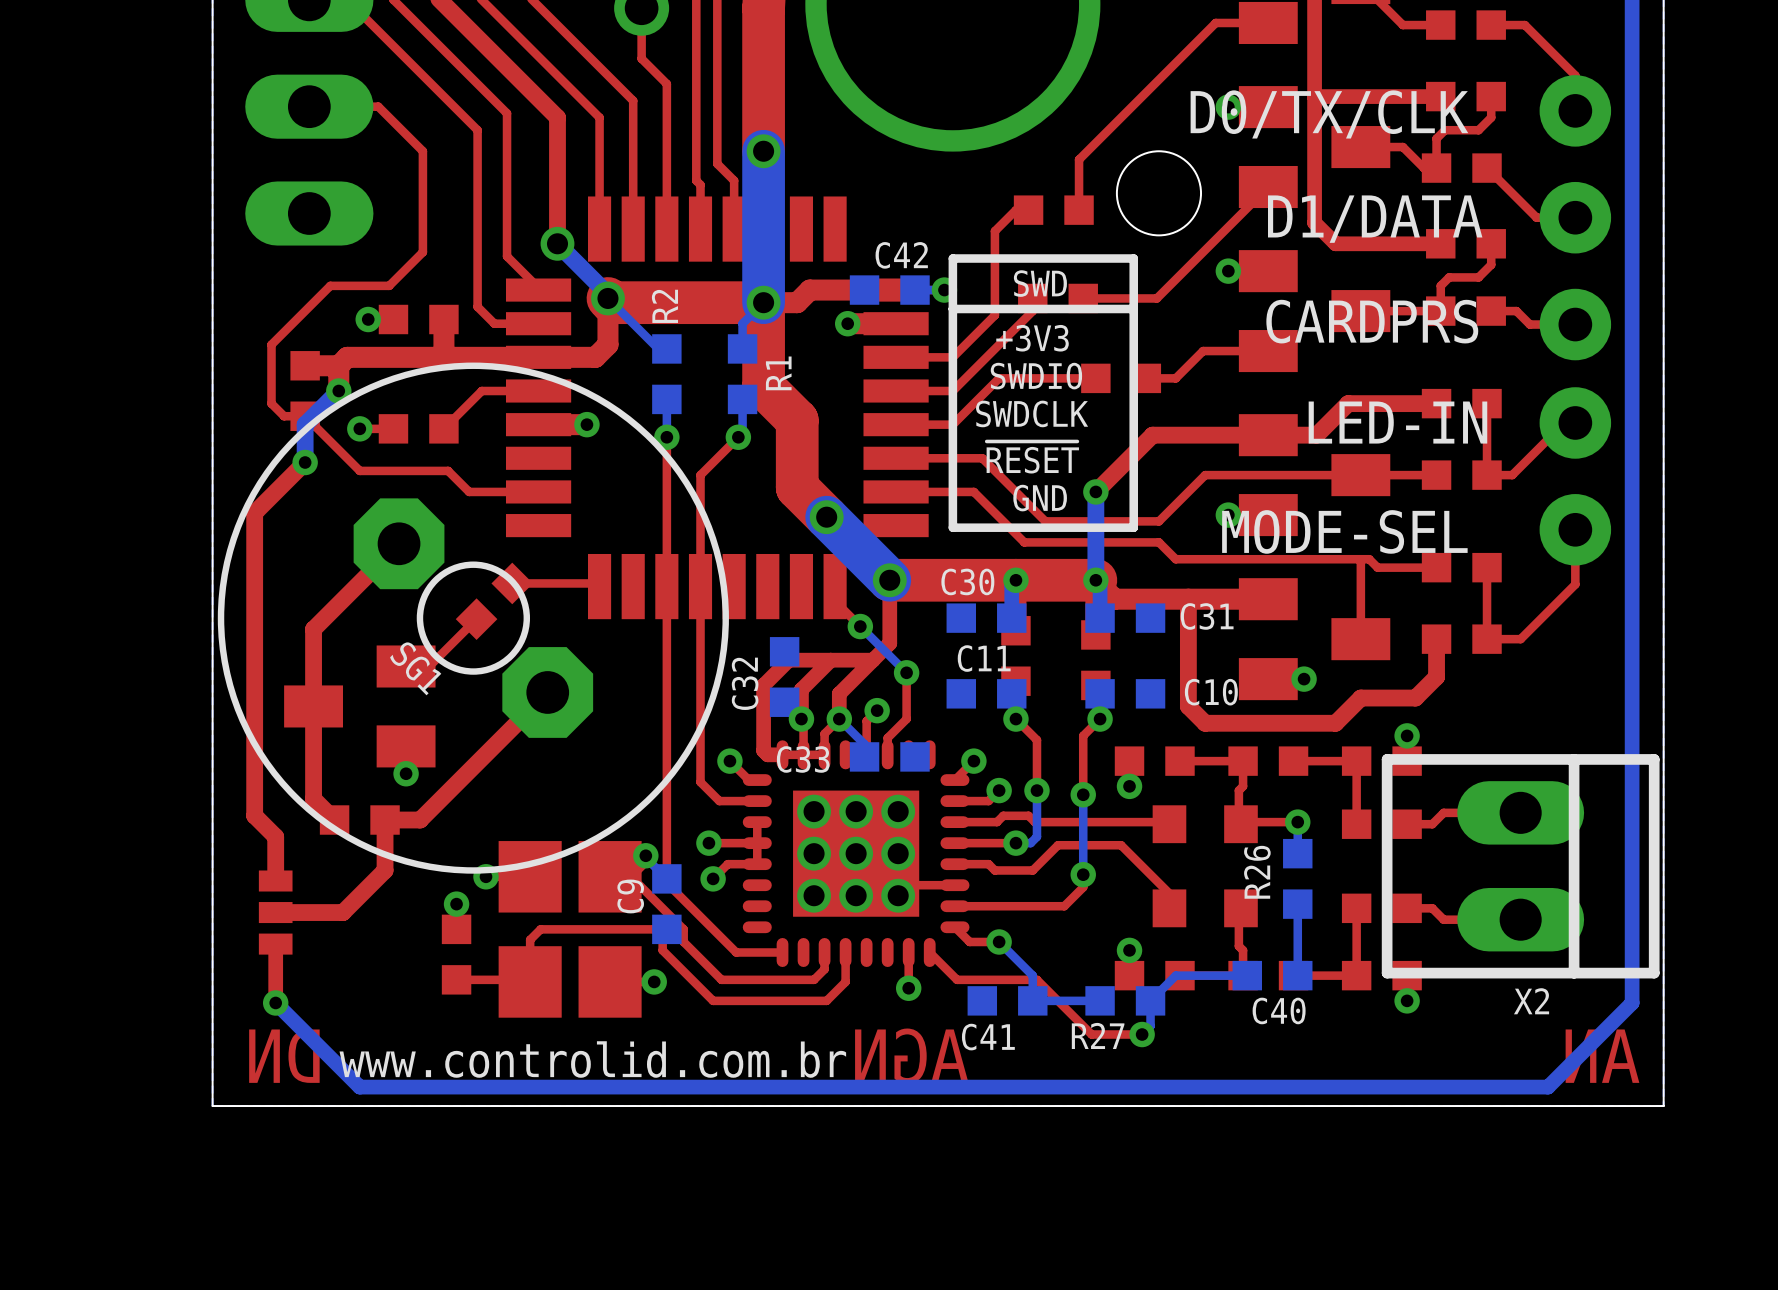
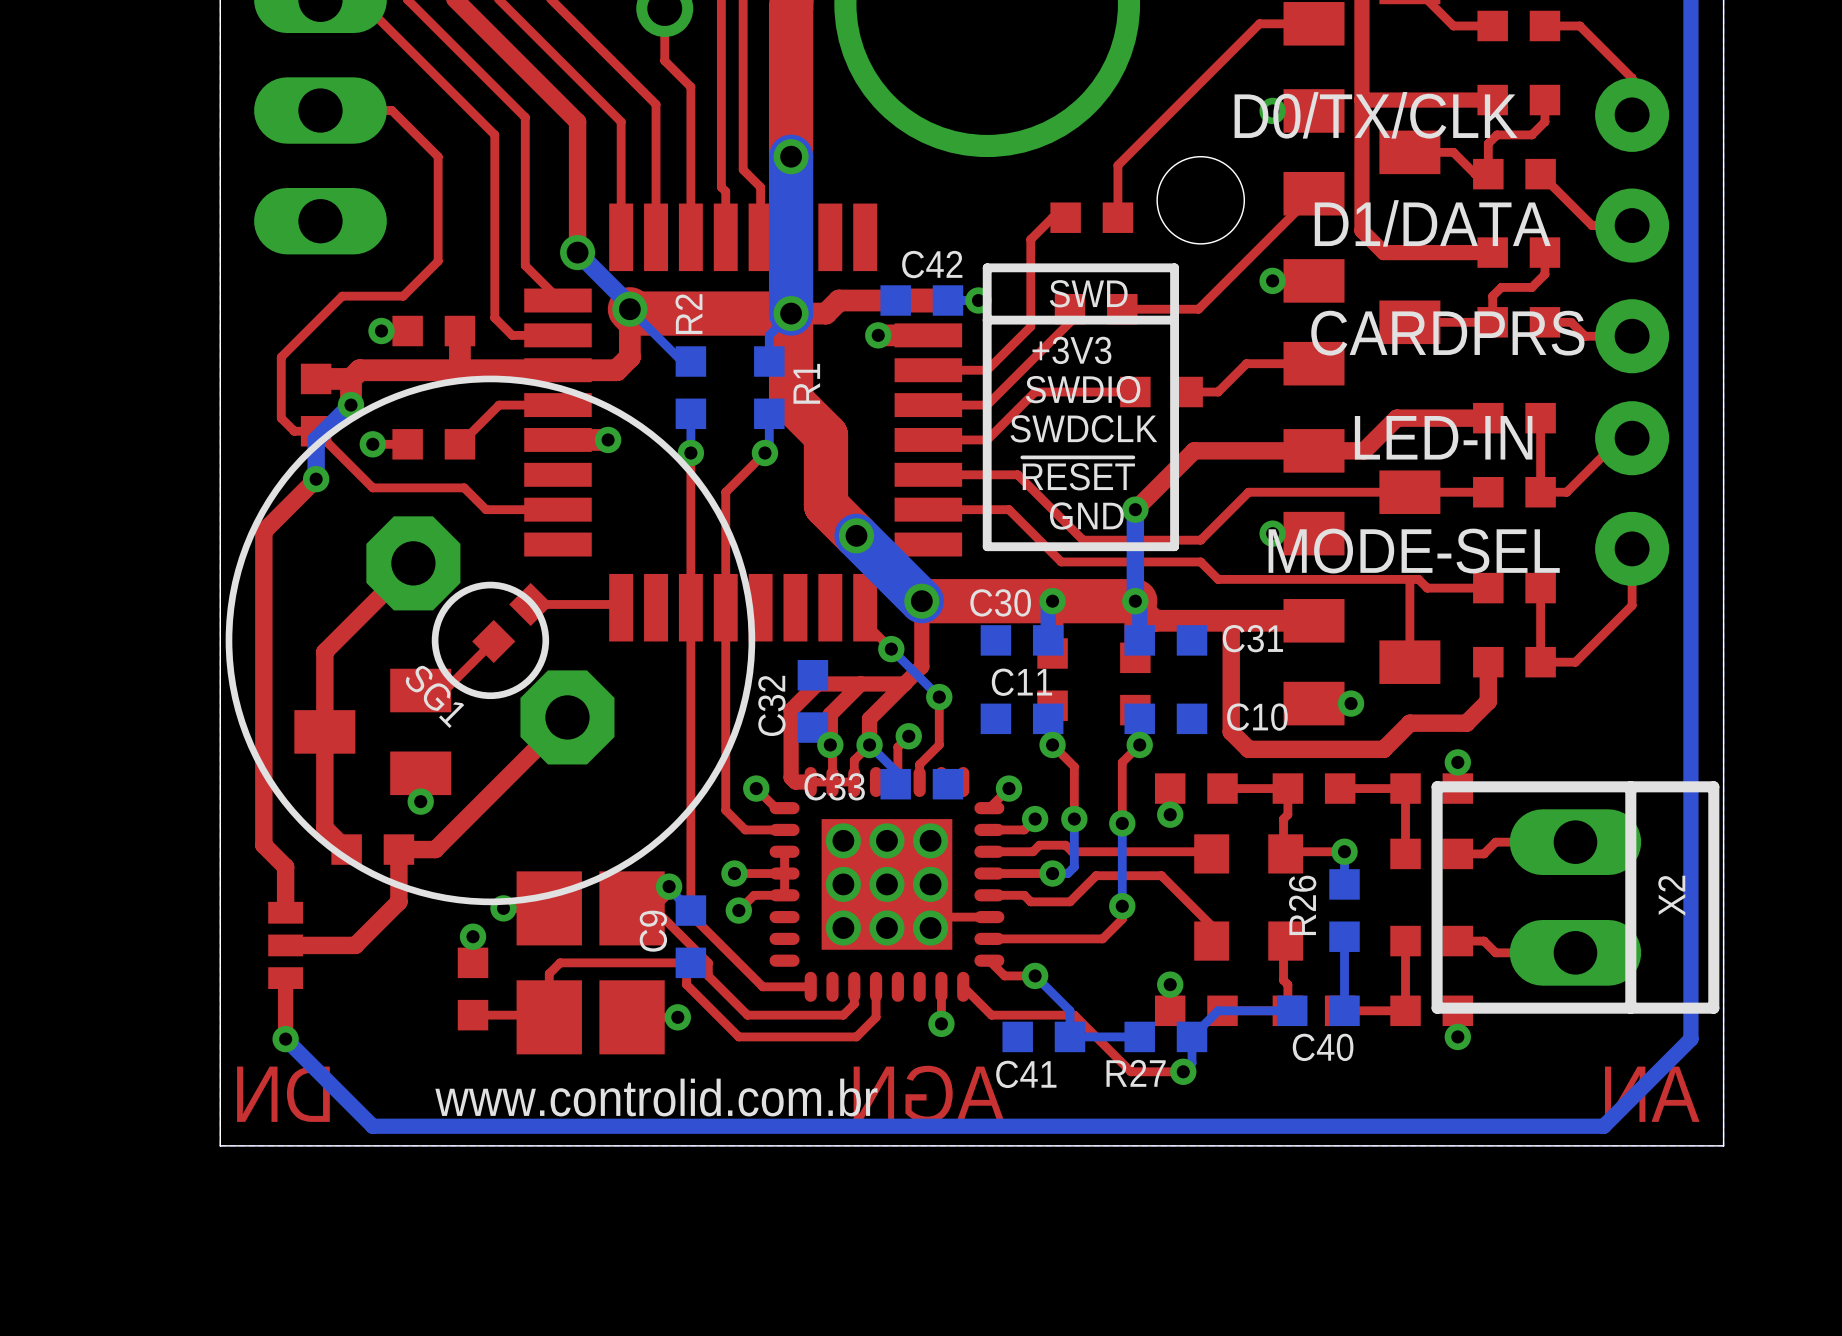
X2 name rotation: 0° (1531, 1001) -> 90° counterclockwise (1671, 895)
X2 name position: X2 (1531, 1001) -> X2 (1671, 895)

